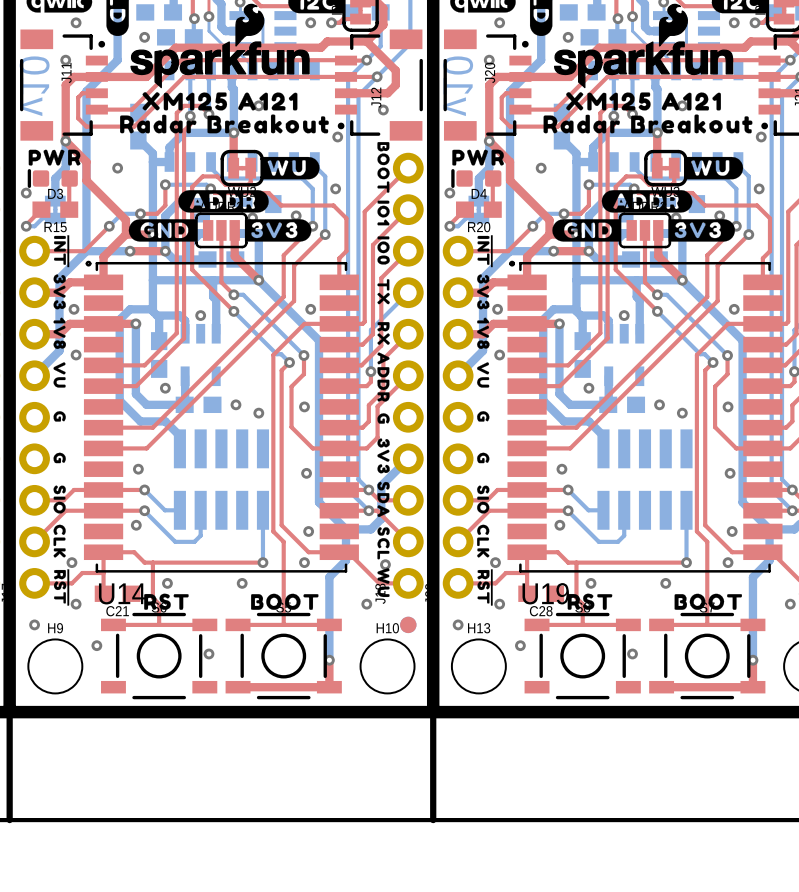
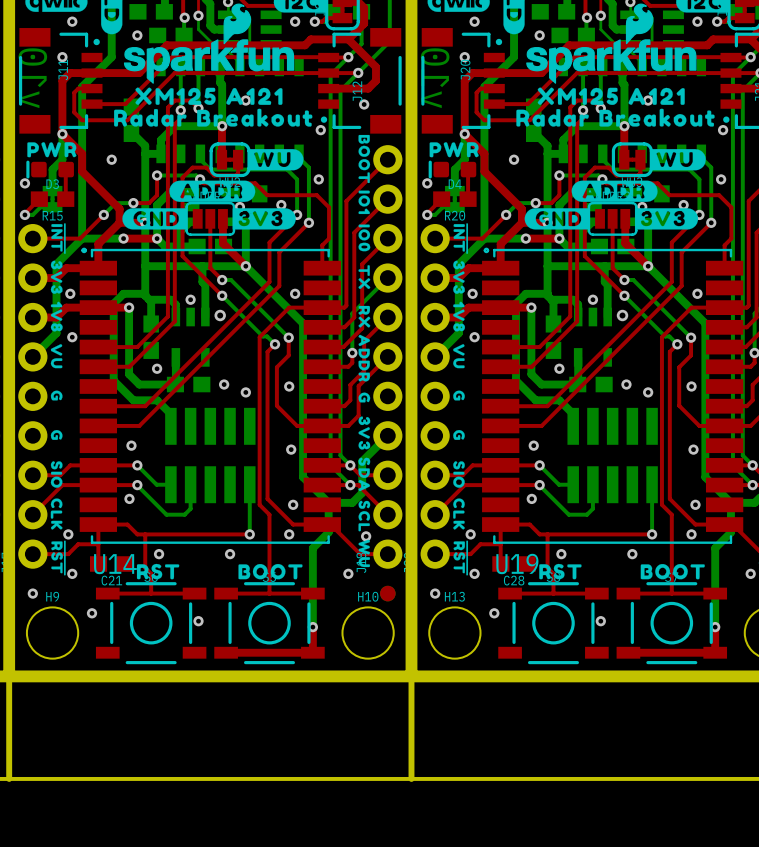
via: none -> (220, 315)
via: none -> (622, 315)

